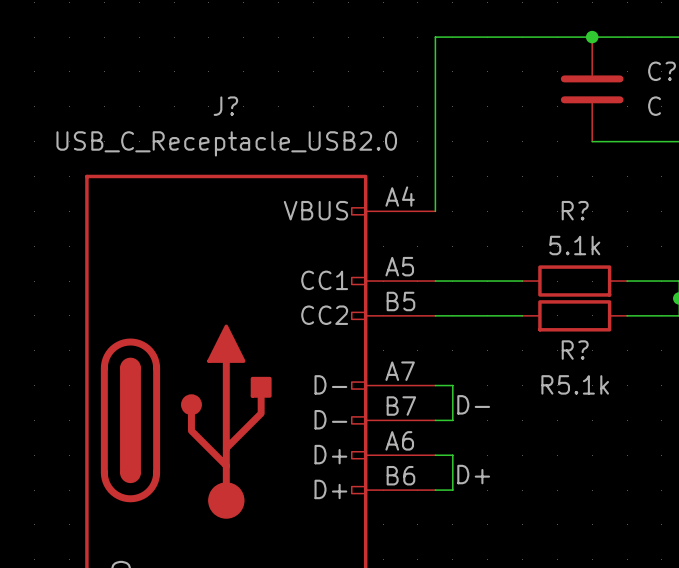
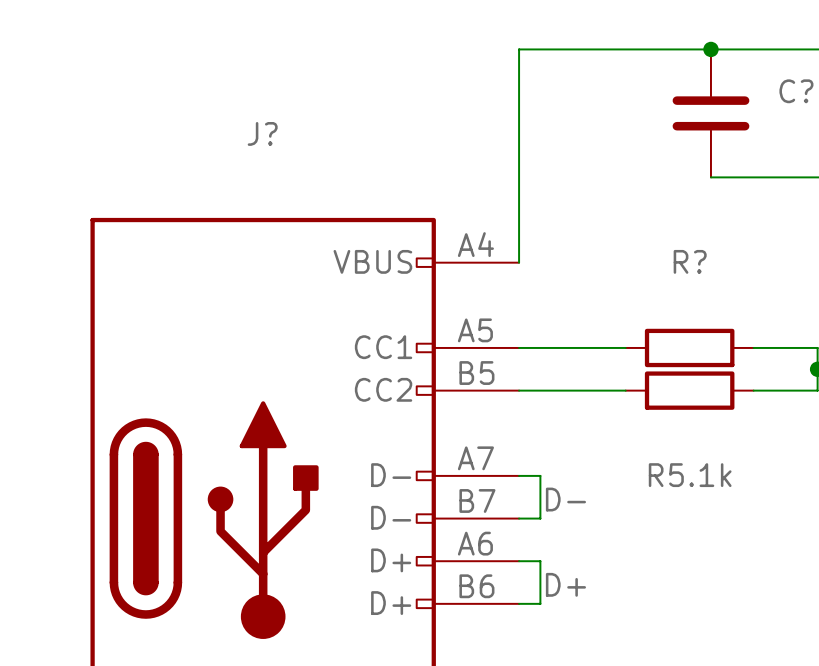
C? value: C (654, 106) -> none
J? value: USB_C_Receptacle_USB2.0 (226, 143) -> none
R? value: 5.1k (574, 245) -> none
R5.1k value: R? (575, 350) -> none

